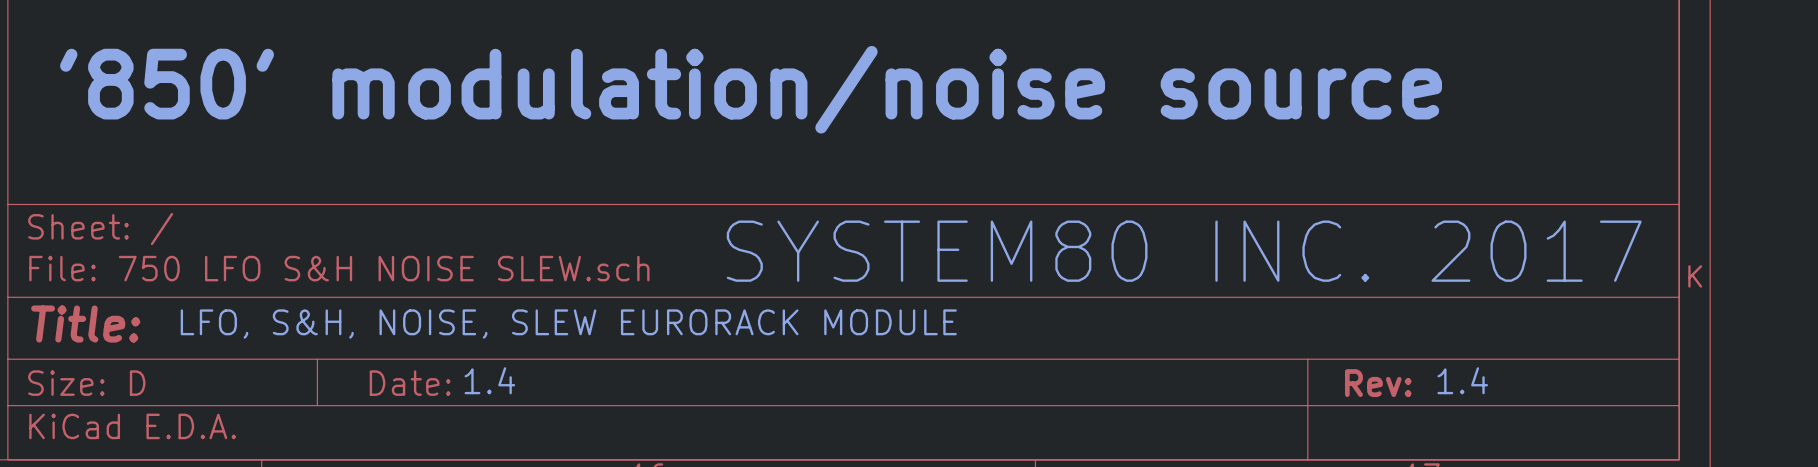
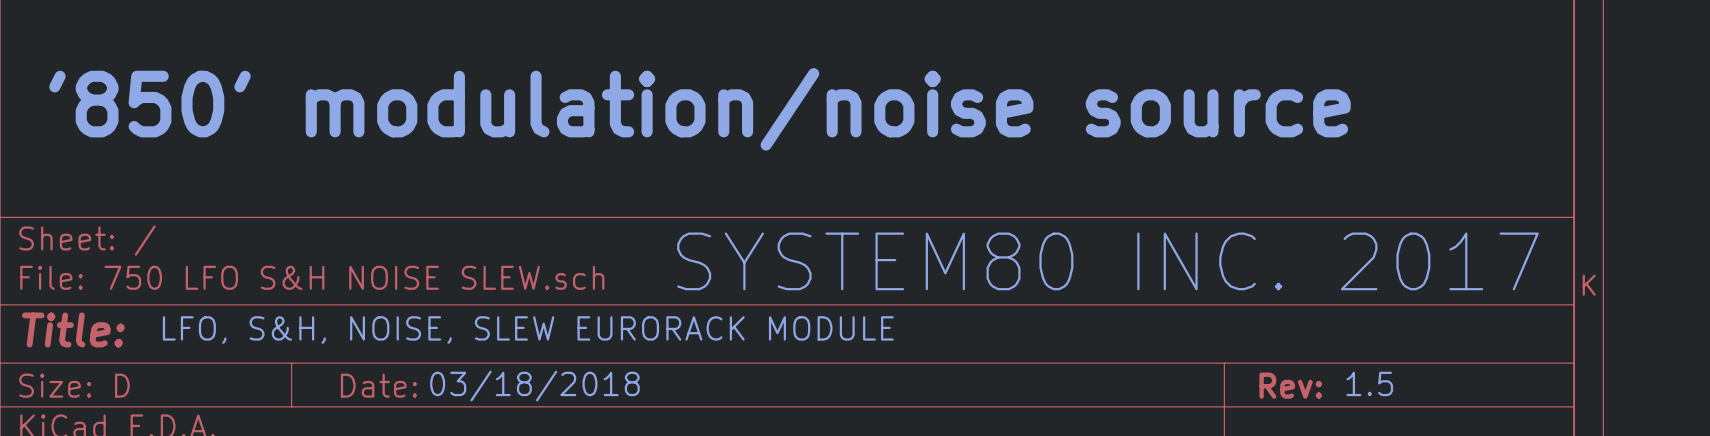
text: 1.4 (489, 380) -> 03/18/2018 (534, 386)
text: 1.4 (1462, 380) -> 1.5 (1369, 383)

